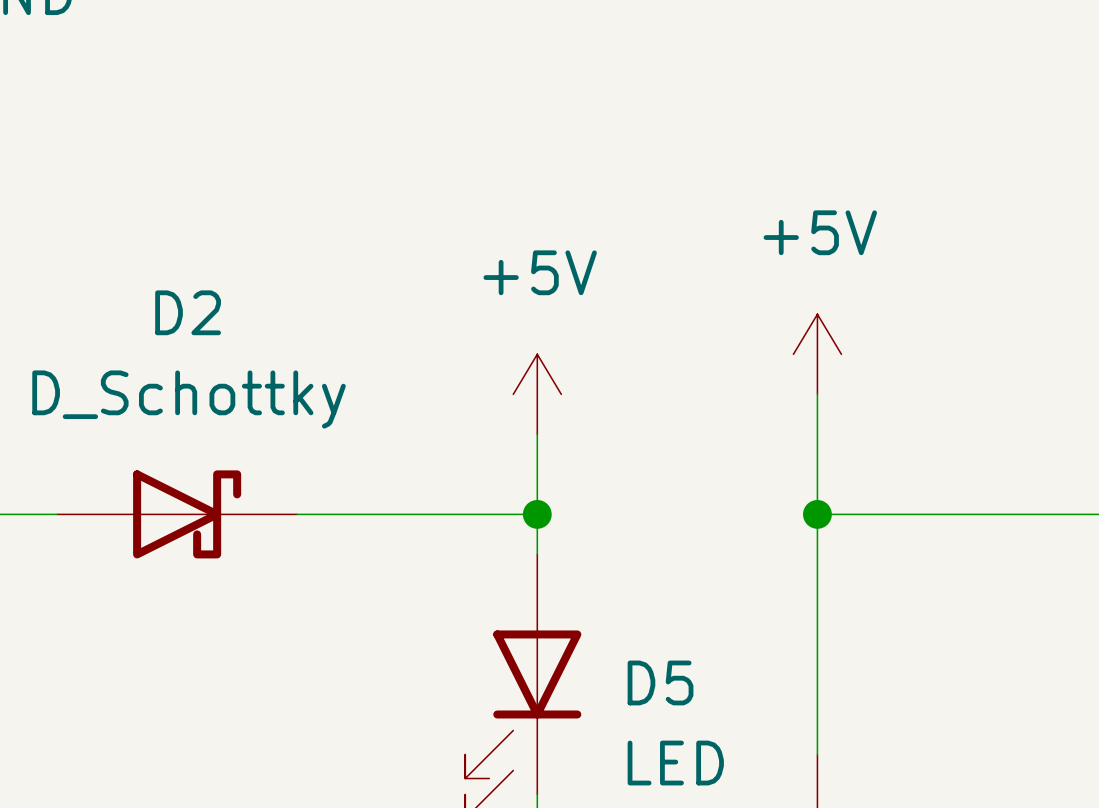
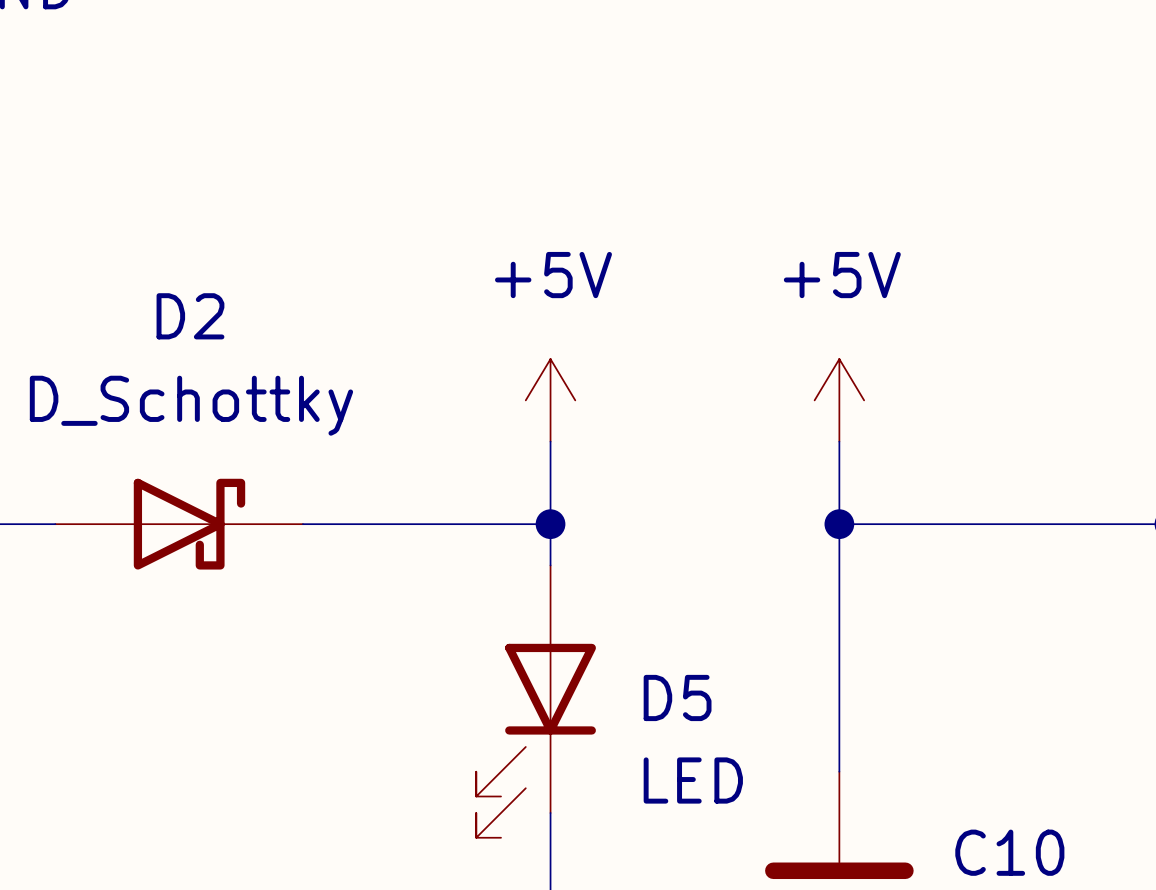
power symbol position: +5V (817, 354) -> +5V (839, 400)

